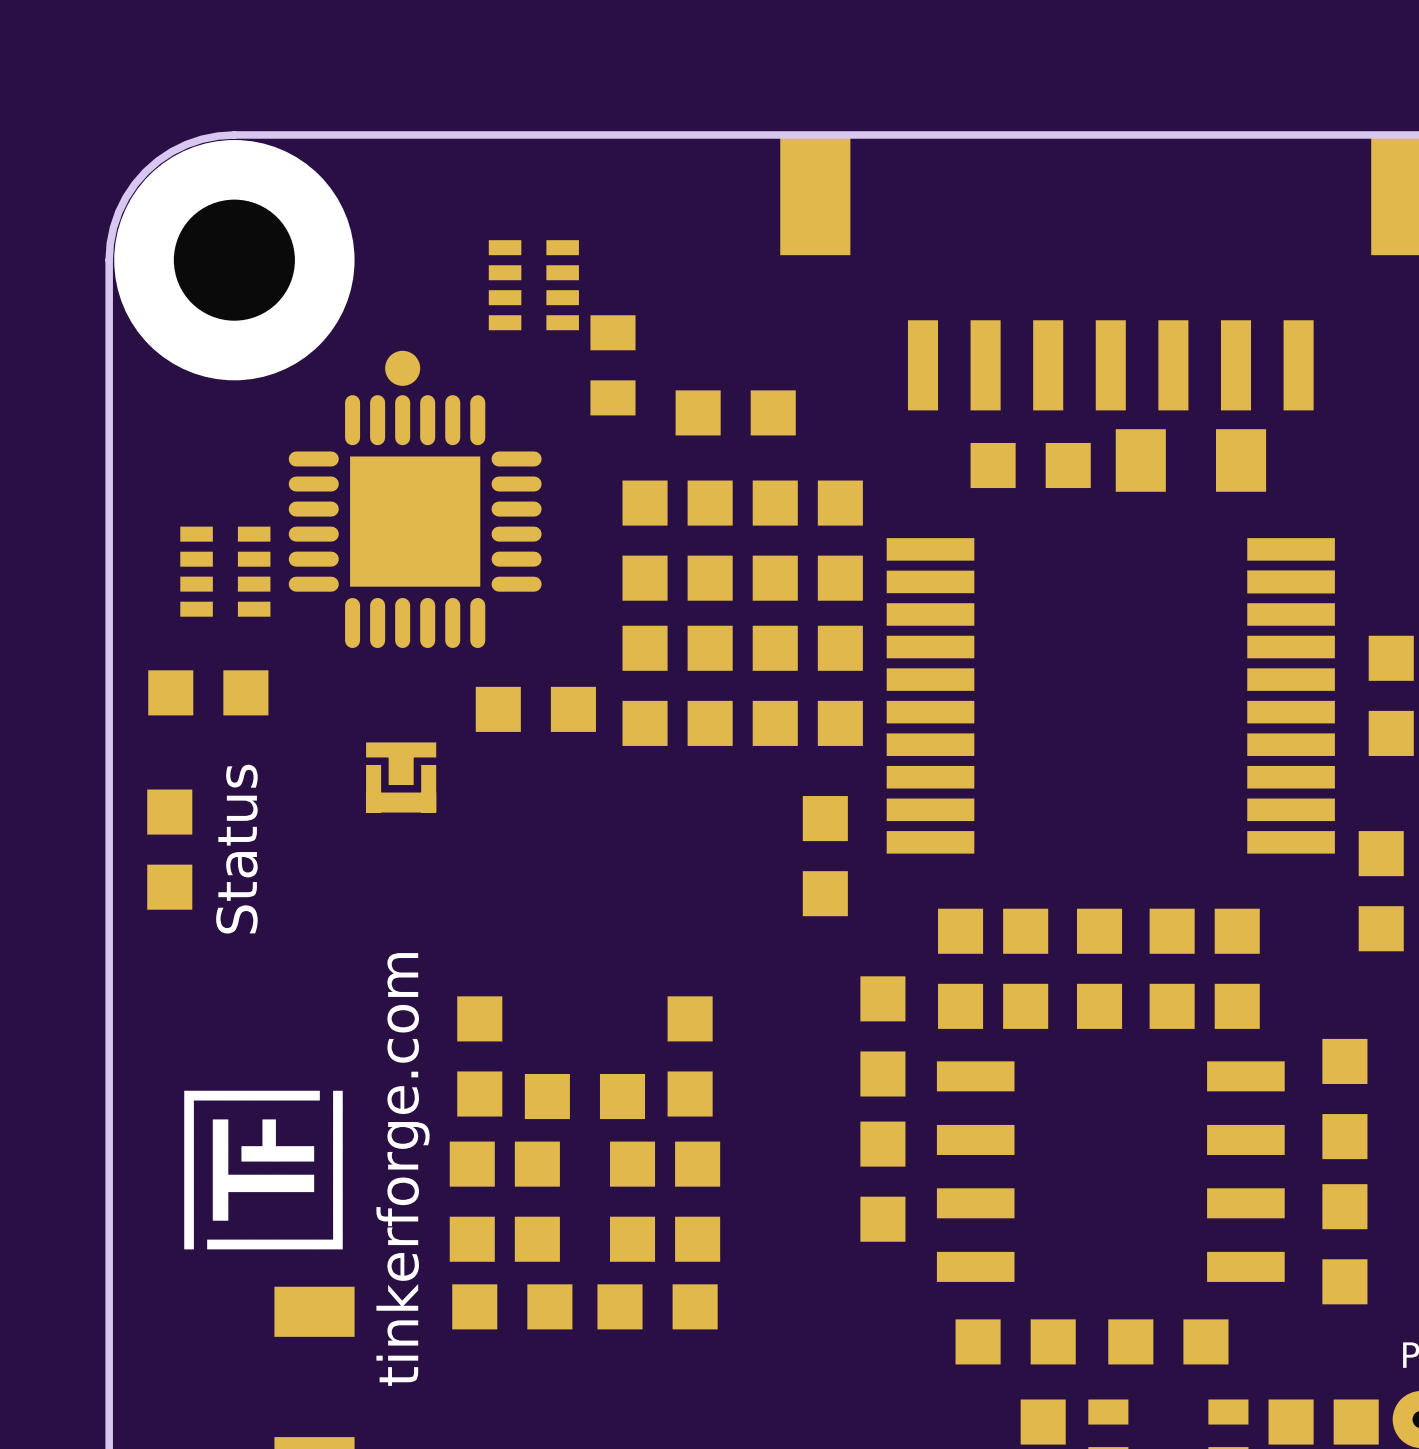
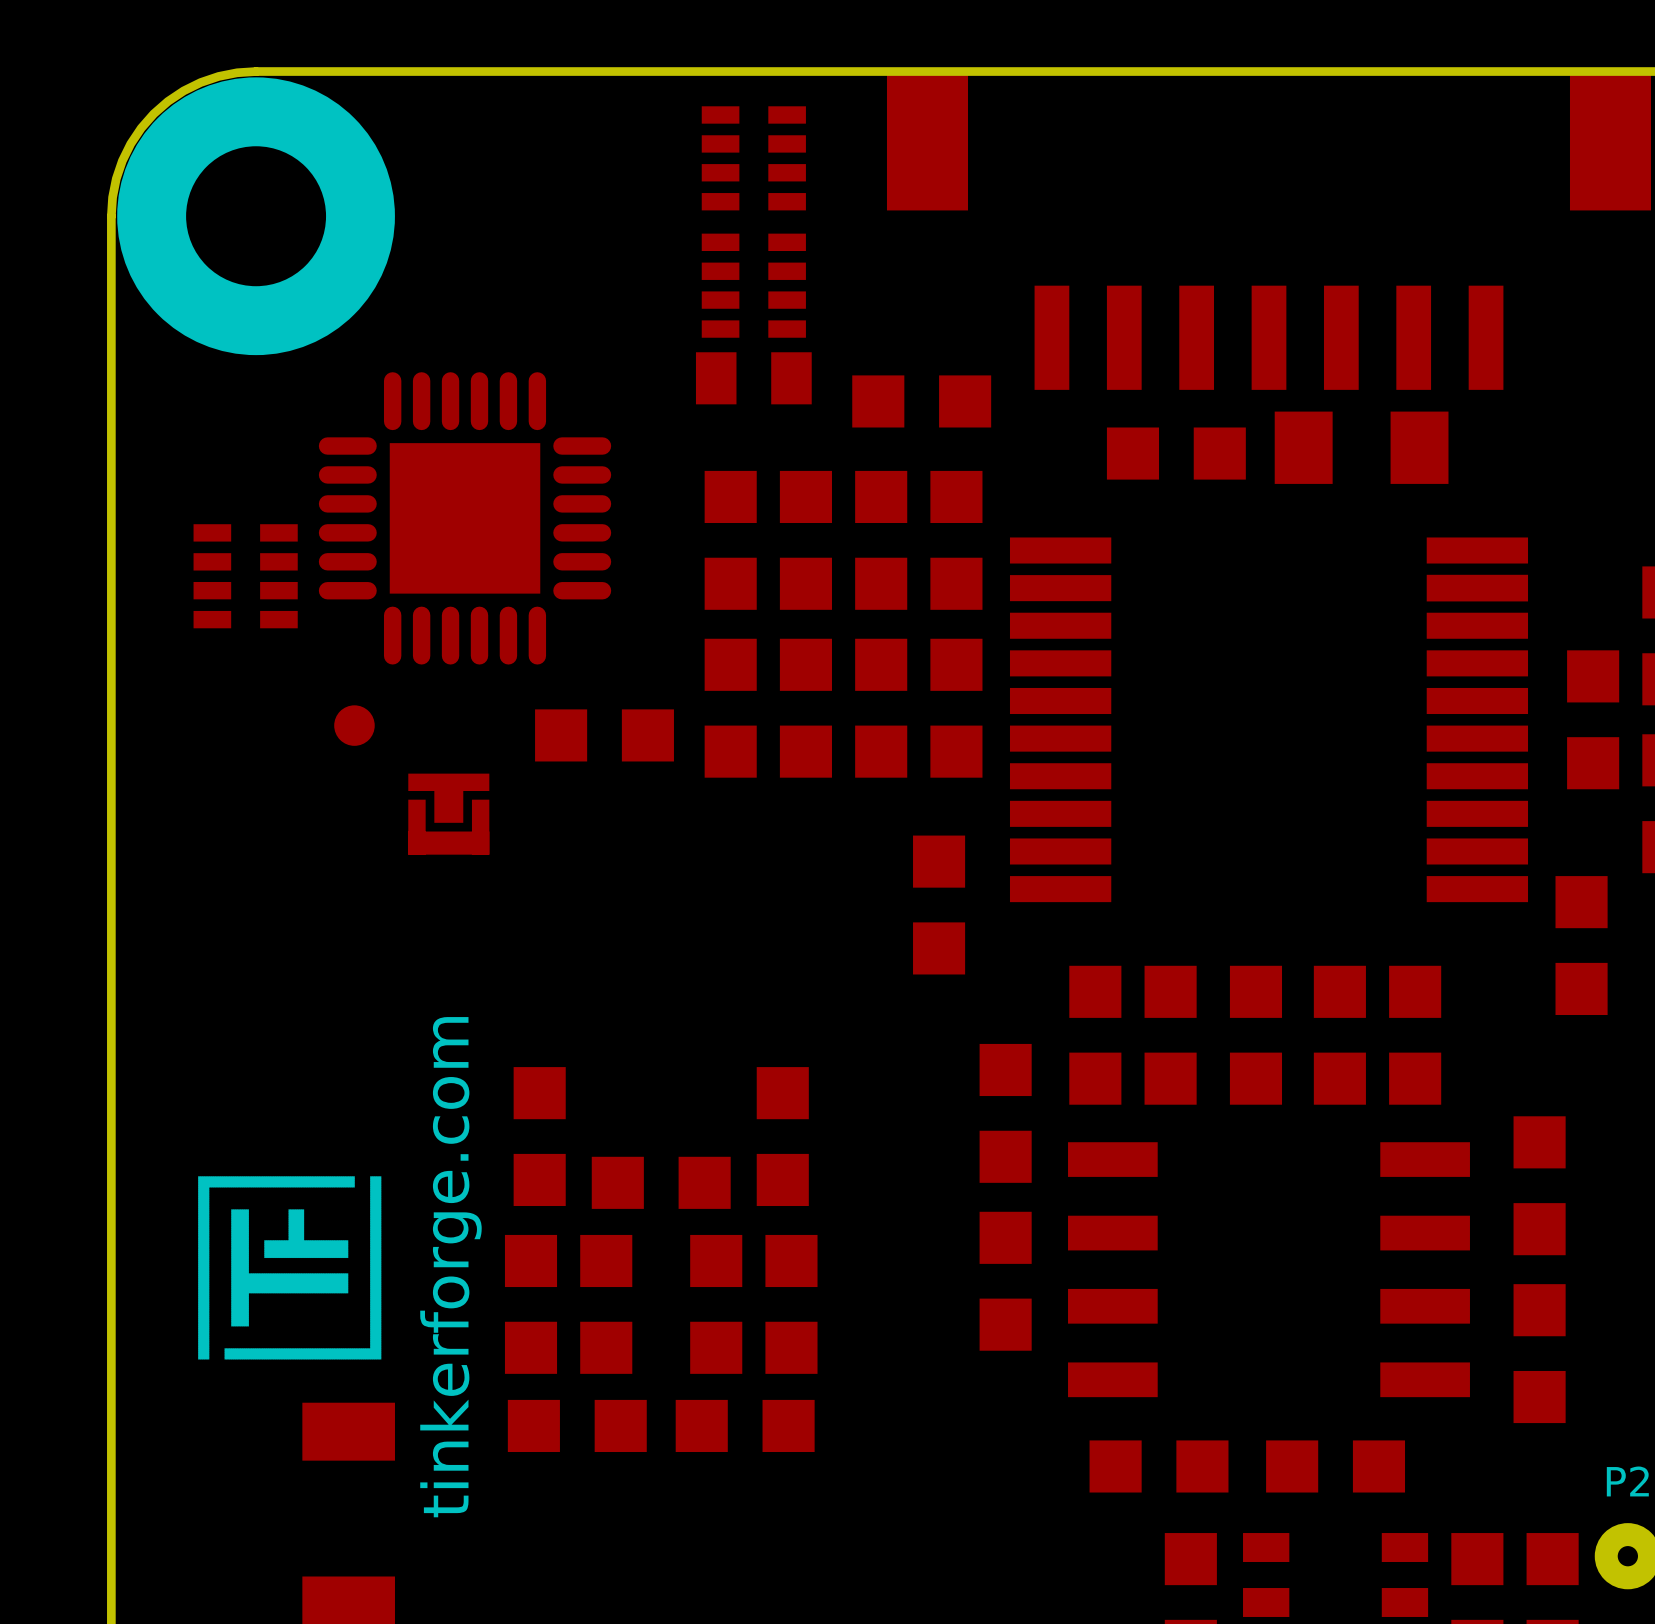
part: none -> (753, 158)
part: (533, 285) -> none
part: none -> (753, 285)
part rotation: 0° (612, 365) -> 90° clockwise (753, 378)
part position: (612, 365) -> (753, 378)
part position: (402, 368) -> (354, 725)
part position: (735, 412) -> (921, 401)
part: (208, 692) -> none
part: (169, 849) -> none
text: Status (236, 849) -> none

